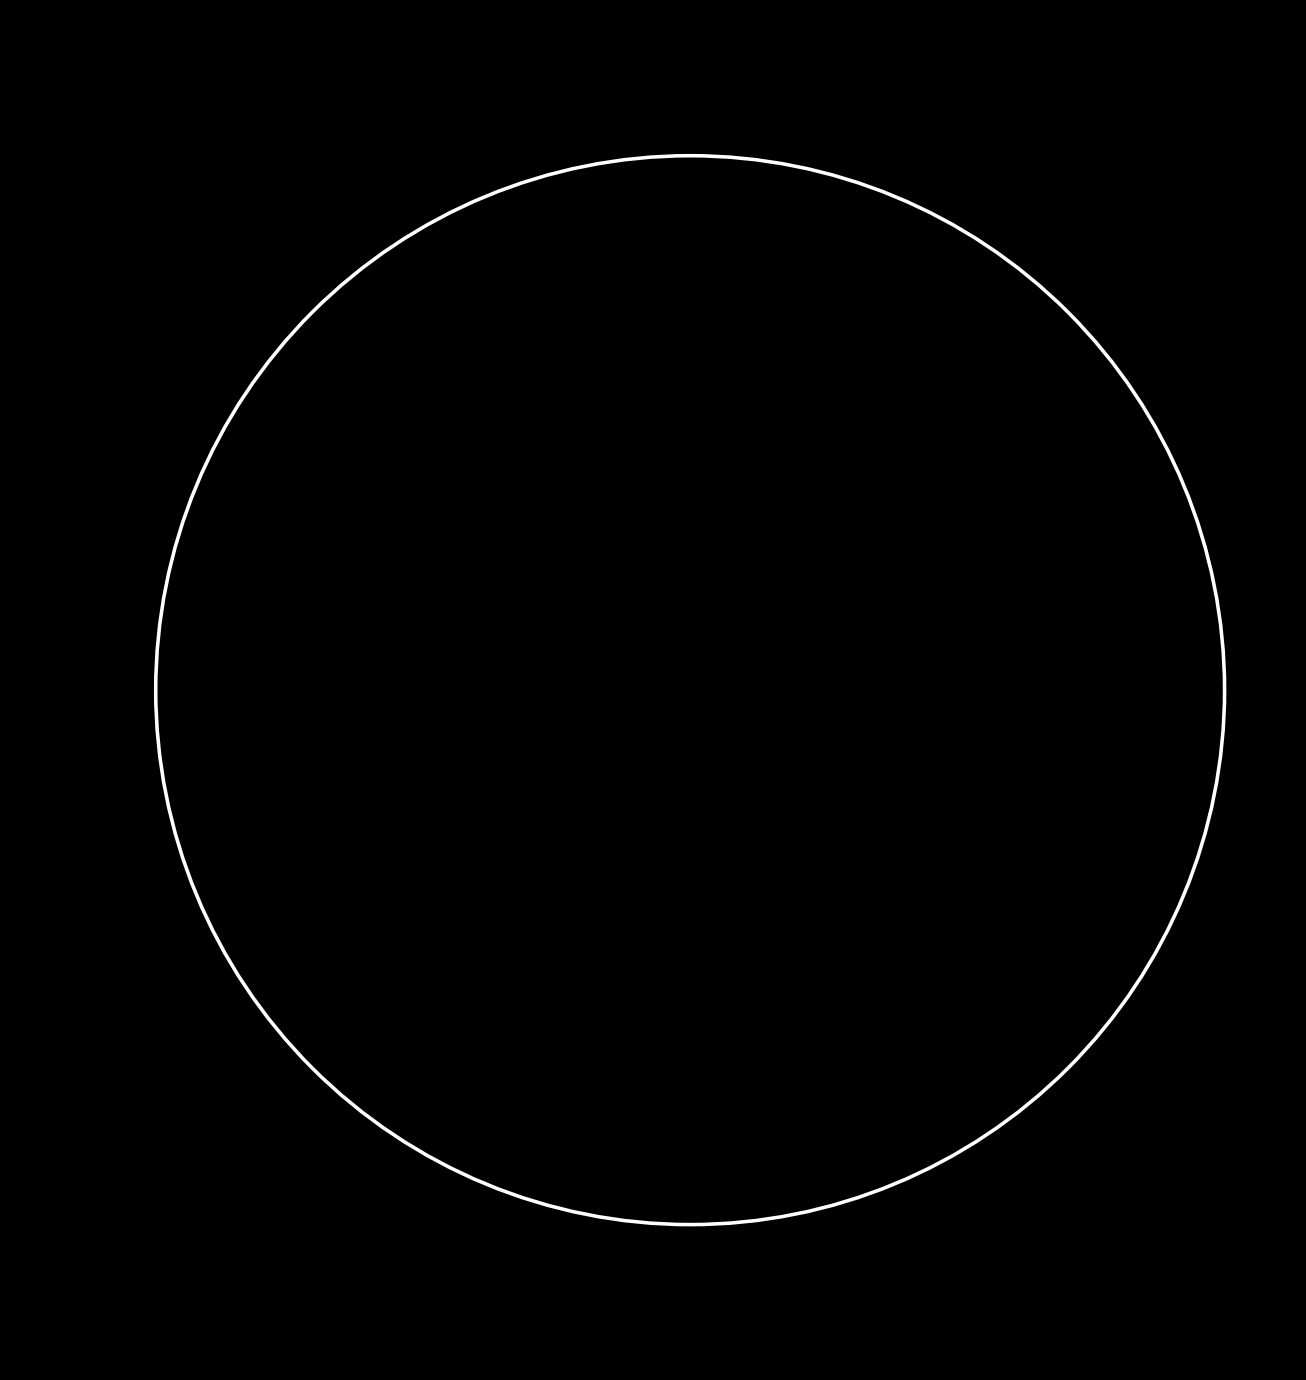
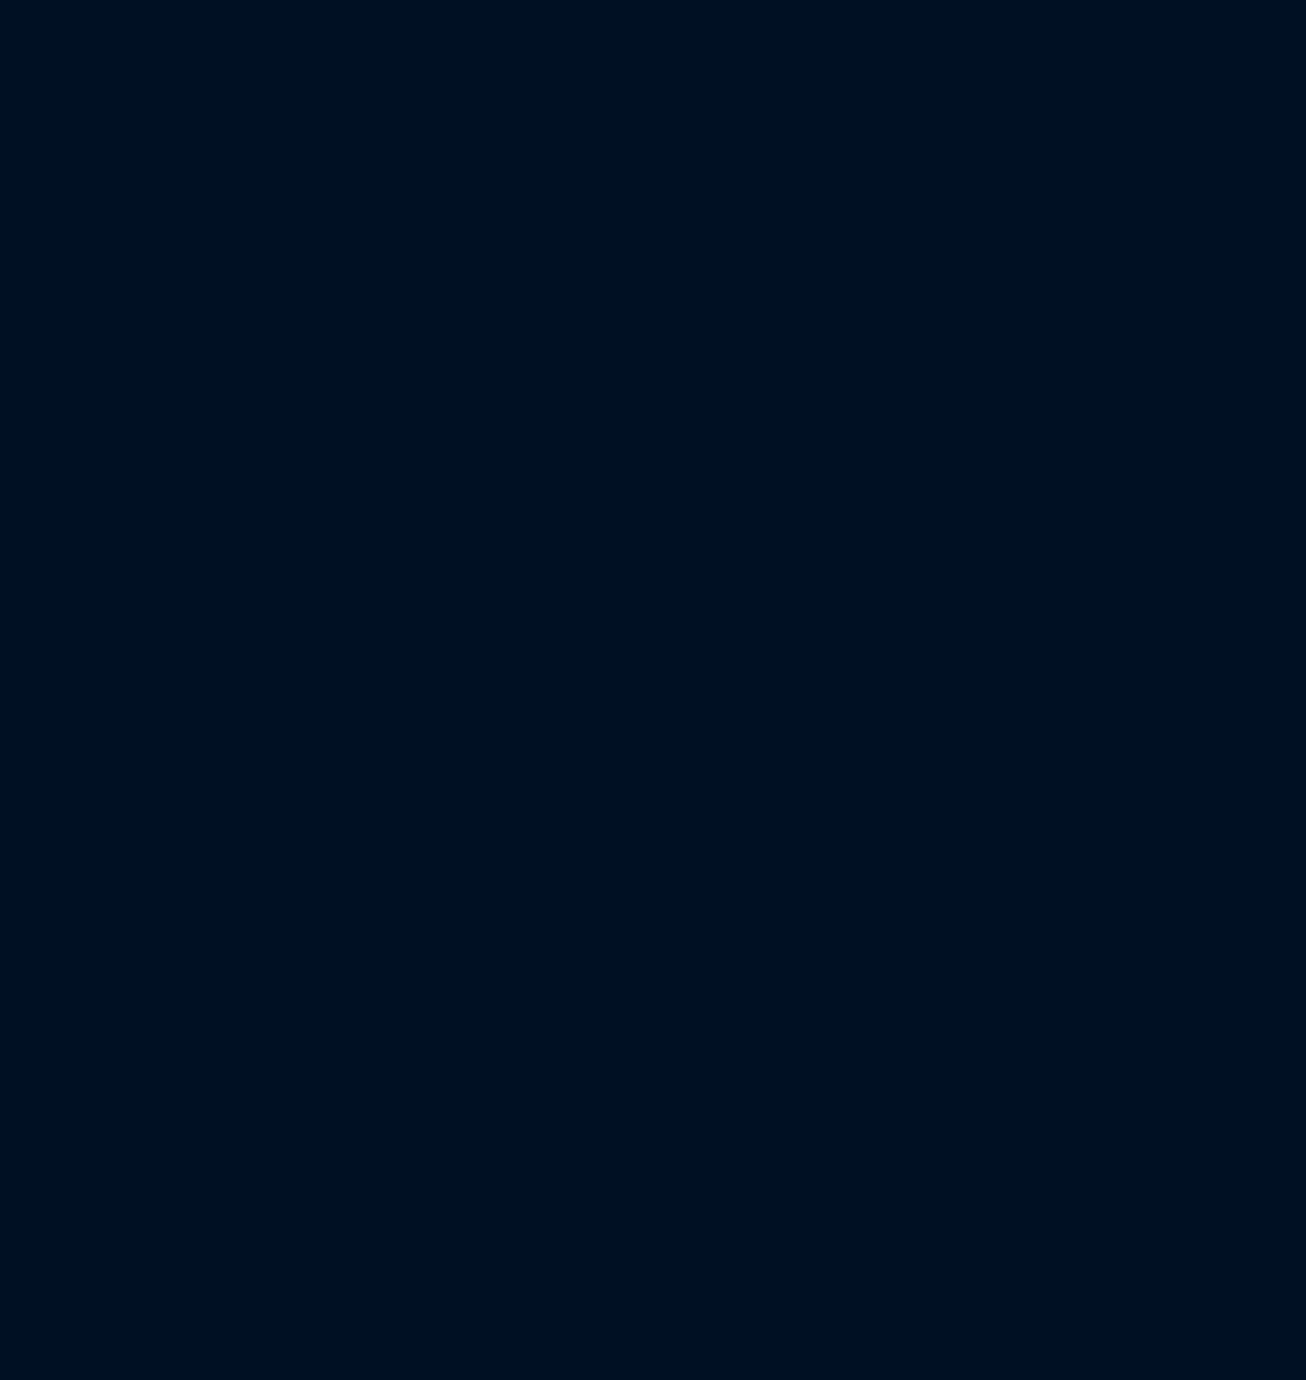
round board edge: [153, 153, 1227, 1227] -> none

